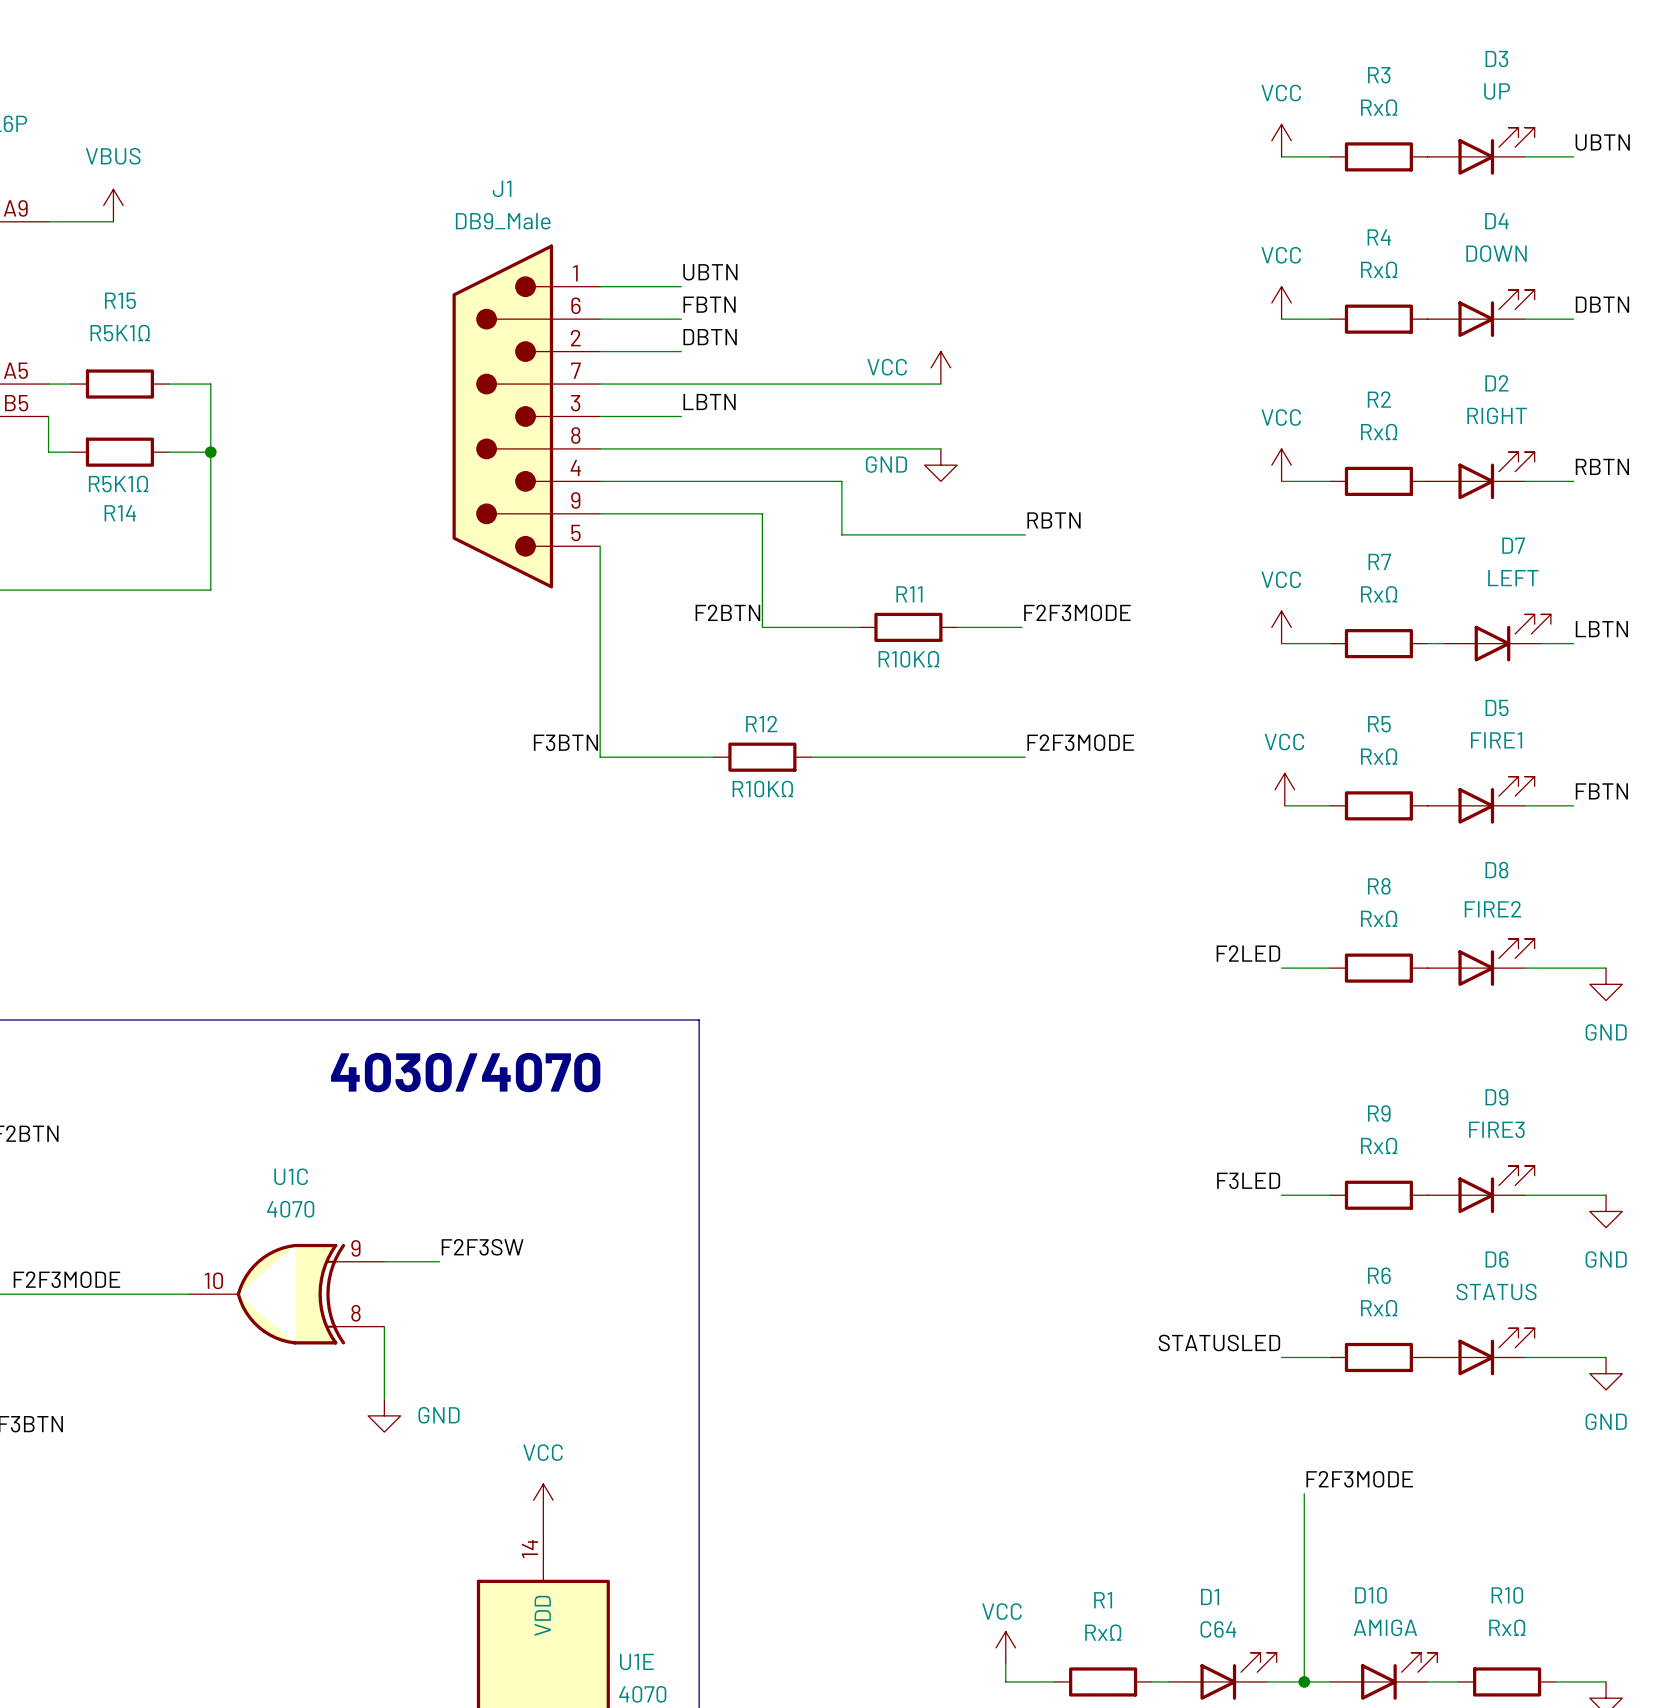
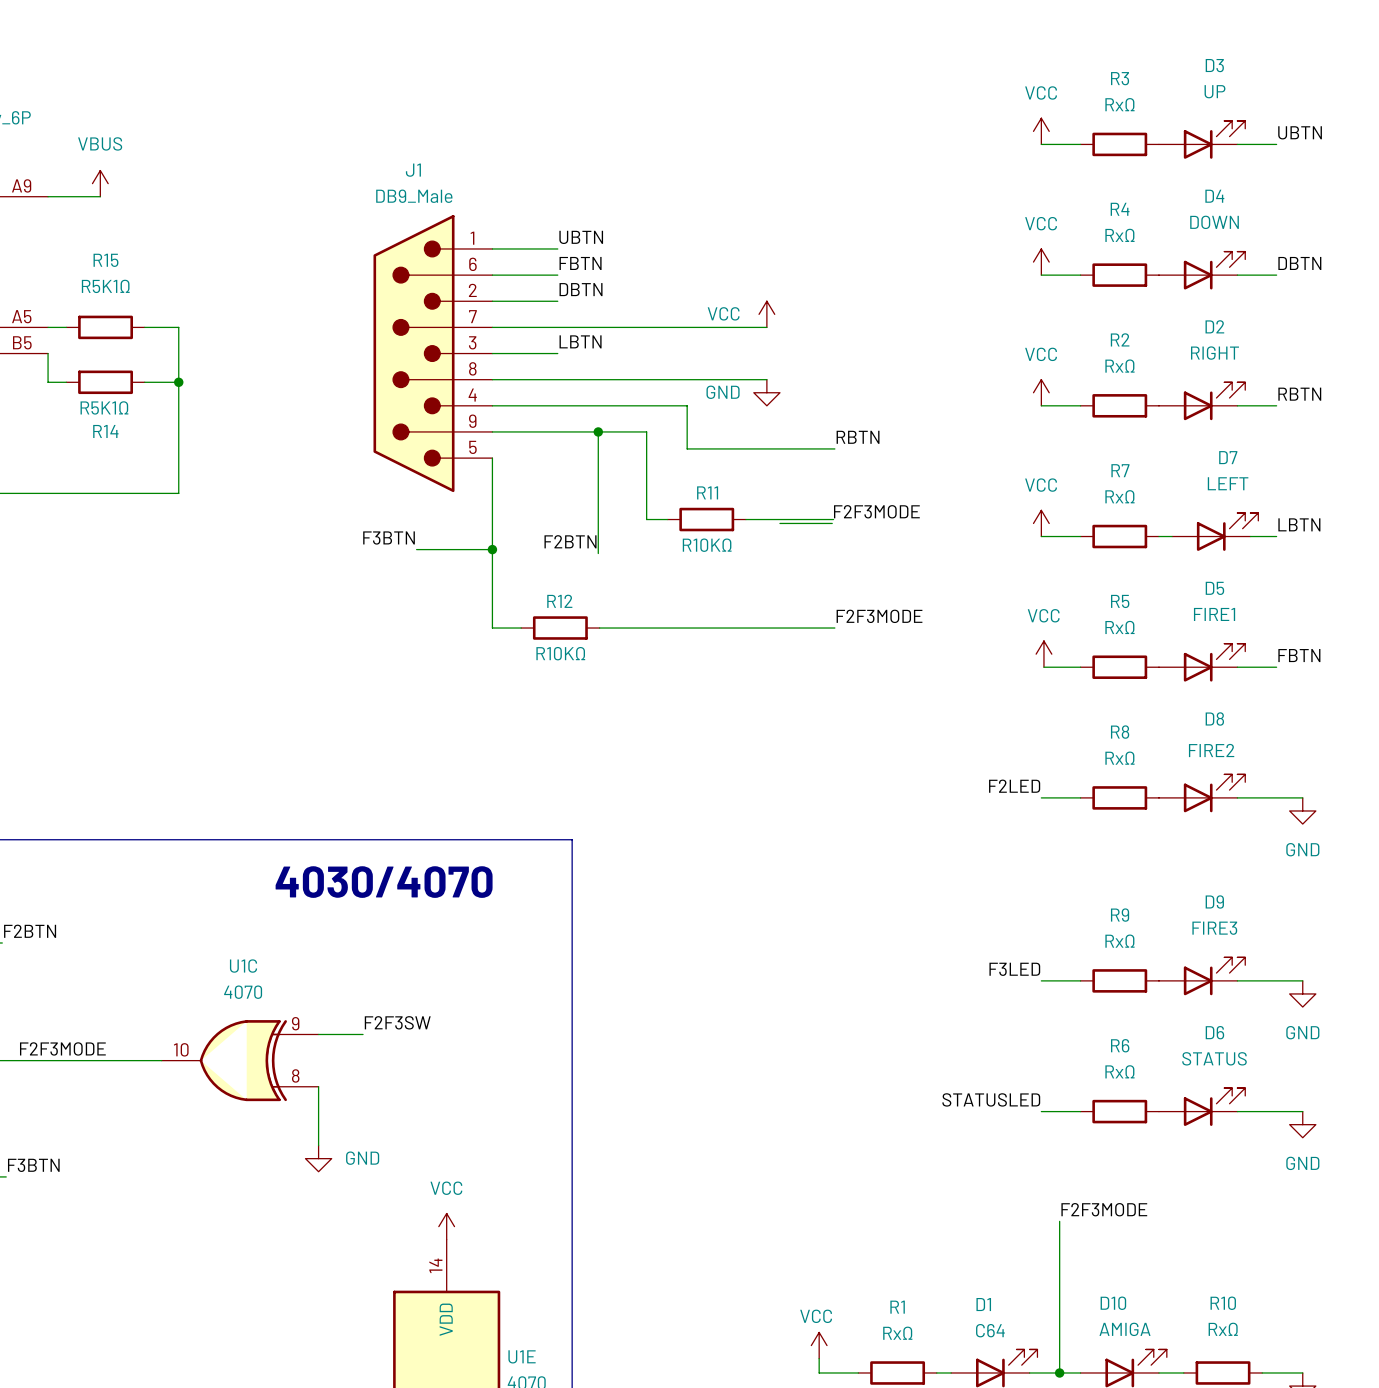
wire: none -> (598, 431) (598, 553)
junction: none -> (598, 431)
wire: (762, 513) (762, 627) (859, 627) -> (623, 431) (646, 431) (646, 519) (667, 519)
label position: F2BTN (727, 612) -> F2BTN (570, 541)
wire: none -> (745, 519) (833, 519)
R11 position: (908, 627) -> (706, 519)
wire: none -> (416, 549) (492, 549)
junction: none -> (492, 549)
label position: F3BTN (565, 742) -> F3BTN (389, 538)
wire: (635, 757) (713, 757) -> (599, 628) (662, 628)
R12 position: (762, 757) -> (560, 628)

